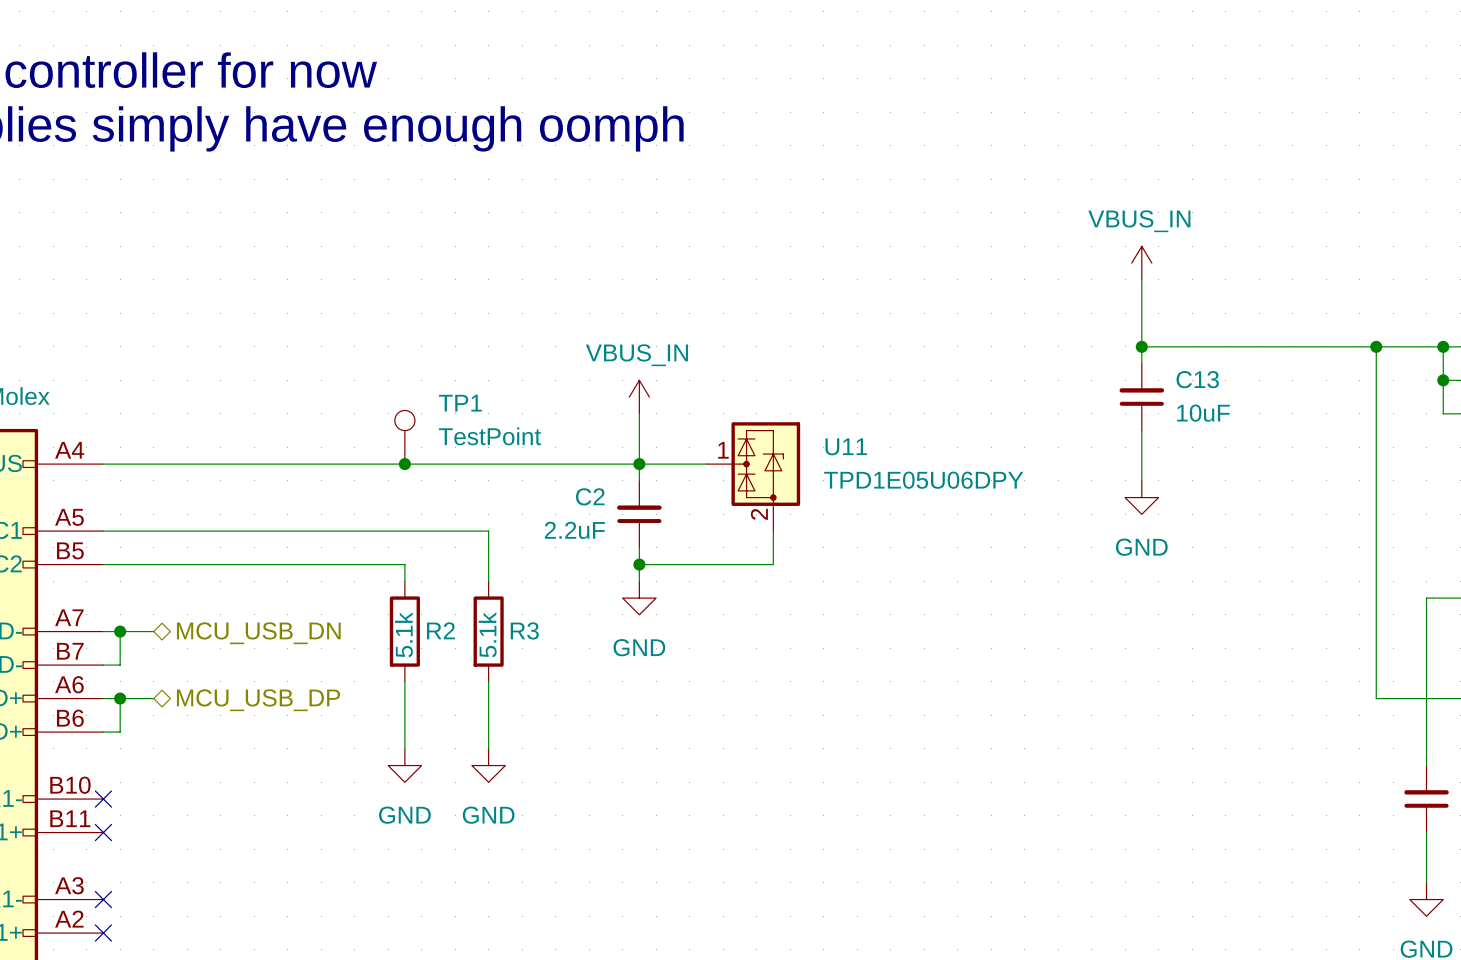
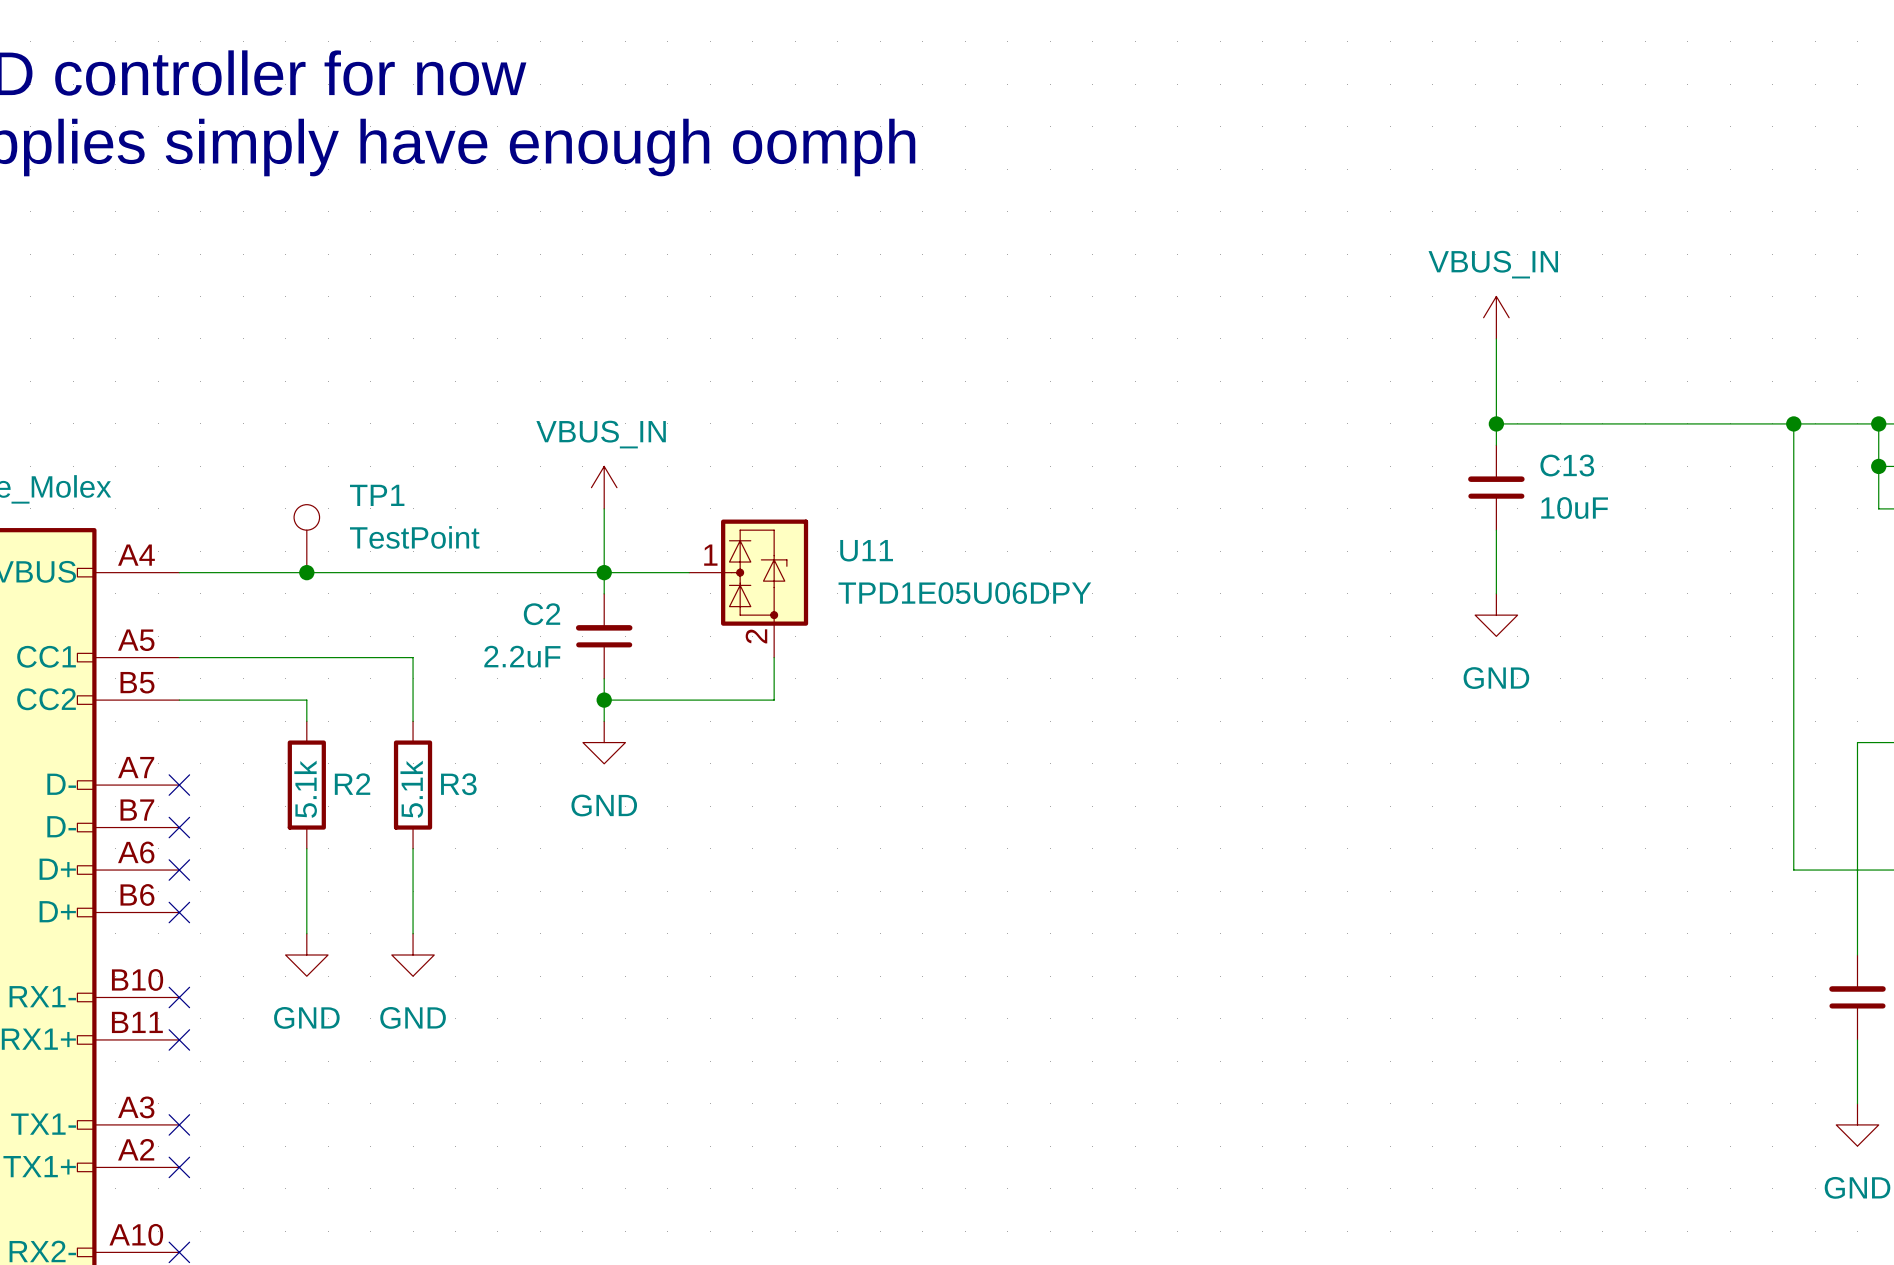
power symbol position: VBUS_IN (639, 397) -> VBUS_IN (604, 487)
wire: (639, 413) (639, 480) -> (604, 508) (604, 593)
TP1 position: (404, 437) -> (306, 538)
junction: none -> (306, 572)
junction position: (404, 464) -> (604, 572)
wire: (505, 464) (706, 464) -> none
junction: (639, 464) -> none
U11 position: (753, 476) -> (748, 588)
C2 position: (639, 514) -> (604, 636)
wire: (287, 531) (488, 531) (488, 581) -> (413, 657) (413, 721)
wire: (773, 531) (773, 564) (639, 564) -> (774, 657) (774, 700) (604, 700)
wire: (639, 547) (639, 581) -> (604, 678) (604, 721)
wire: (203, 564) (404, 564) (404, 581) -> (306, 700) (306, 721)
junction: none -> (604, 700)
junction: (639, 564) -> none
power symbol: none -> GND (604, 742)
power symbol: GND (639, 598) -> none
wire: (103, 631) (153, 631) -> none
no-connect mark: none -> (179, 785)
wire: (120, 631) (120, 665) (103, 665) -> none
junction: (120, 631) -> none
R2 position: (404, 631) -> (306, 785)
R3 position: (488, 631) -> (413, 785)
hierarchical label: MCU_USB_DN (258, 633) -> none
no-connect mark: none -> (179, 827)
wire: (404, 681) (404, 748) -> (306, 848) (306, 933)
wire: (488, 681) (488, 748) -> (413, 848) (413, 933)
wire: (103, 698) (153, 698) -> none
no-connect mark: none -> (179, 870)
wire: (120, 698) (120, 732) (103, 732) -> none
junction: (120, 698) -> none
hierarchical label: MCU_USB_DP (258, 700) -> none
no-connect mark: none -> (179, 912)
power symbol: none -> GND (306, 955)
power symbol: none -> GND (413, 955)
power symbol: GND (404, 765) -> none
power symbol: GND (488, 765) -> none

